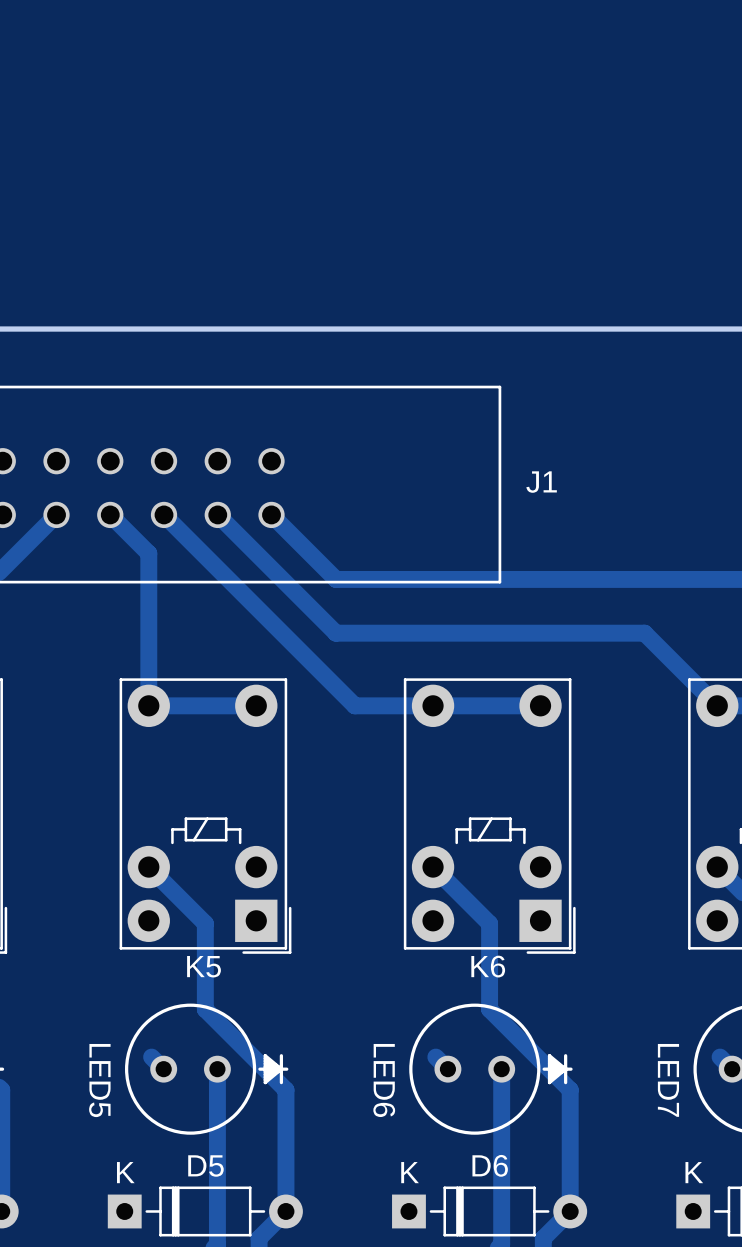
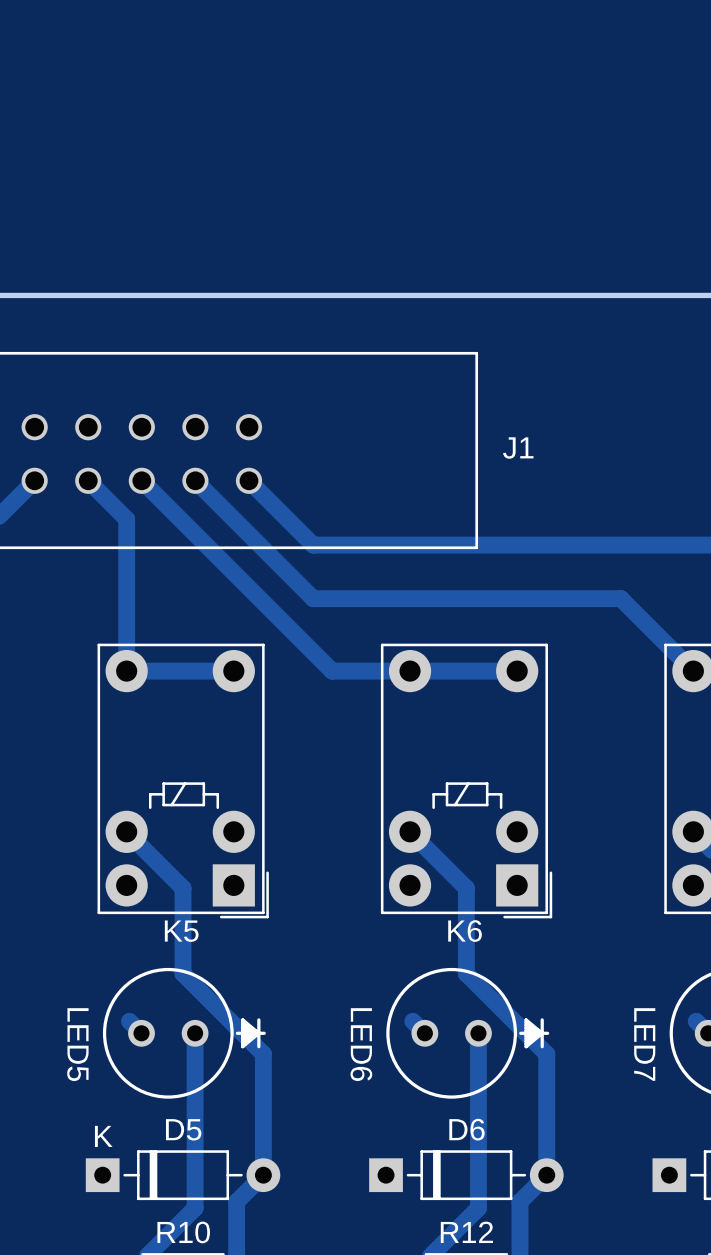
D6 text: K (410, 1172) -> none
part text: K (694, 1172) -> none

